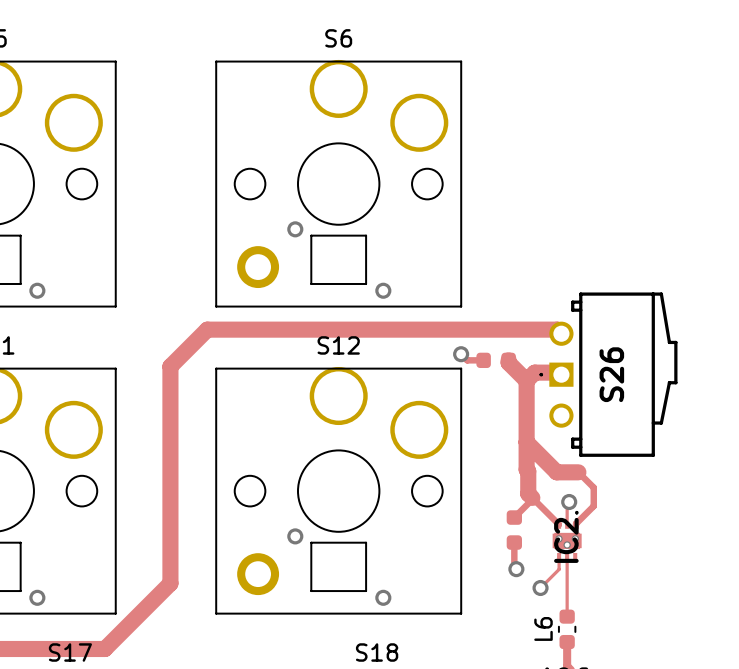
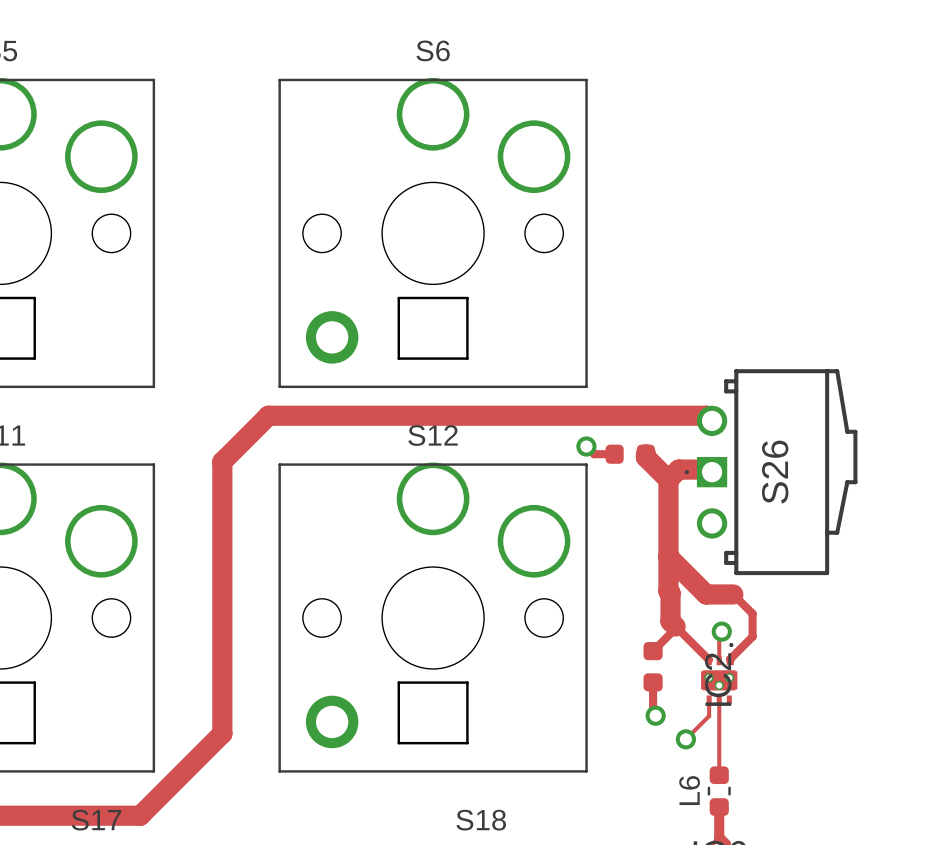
via: (295, 229) -> none
via: (37, 290) -> none
via: (383, 290) -> none
via: (295, 536) -> none
via: (37, 597) -> none
via: (383, 597) -> none

